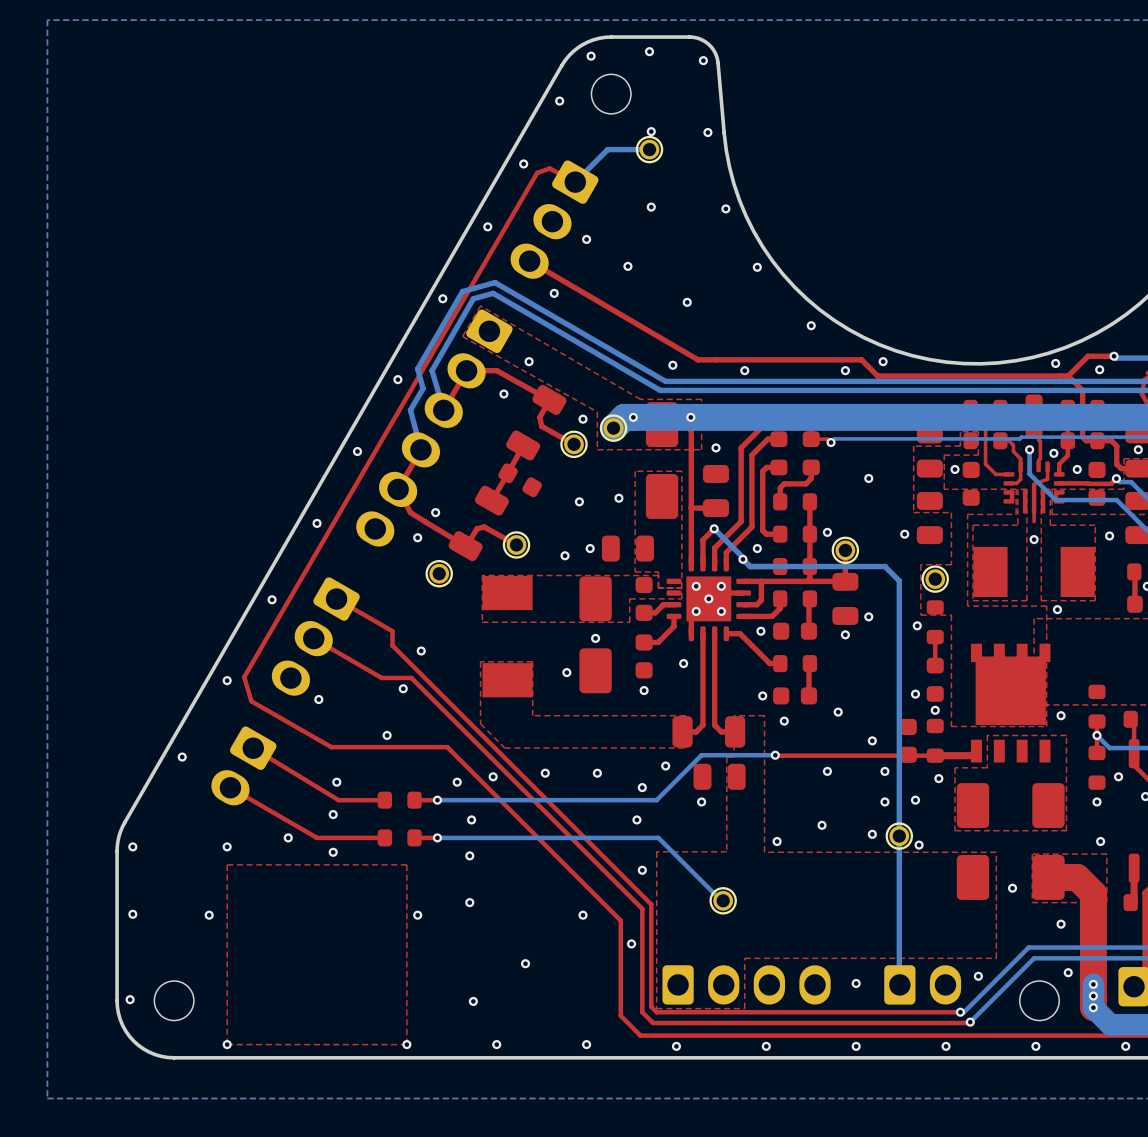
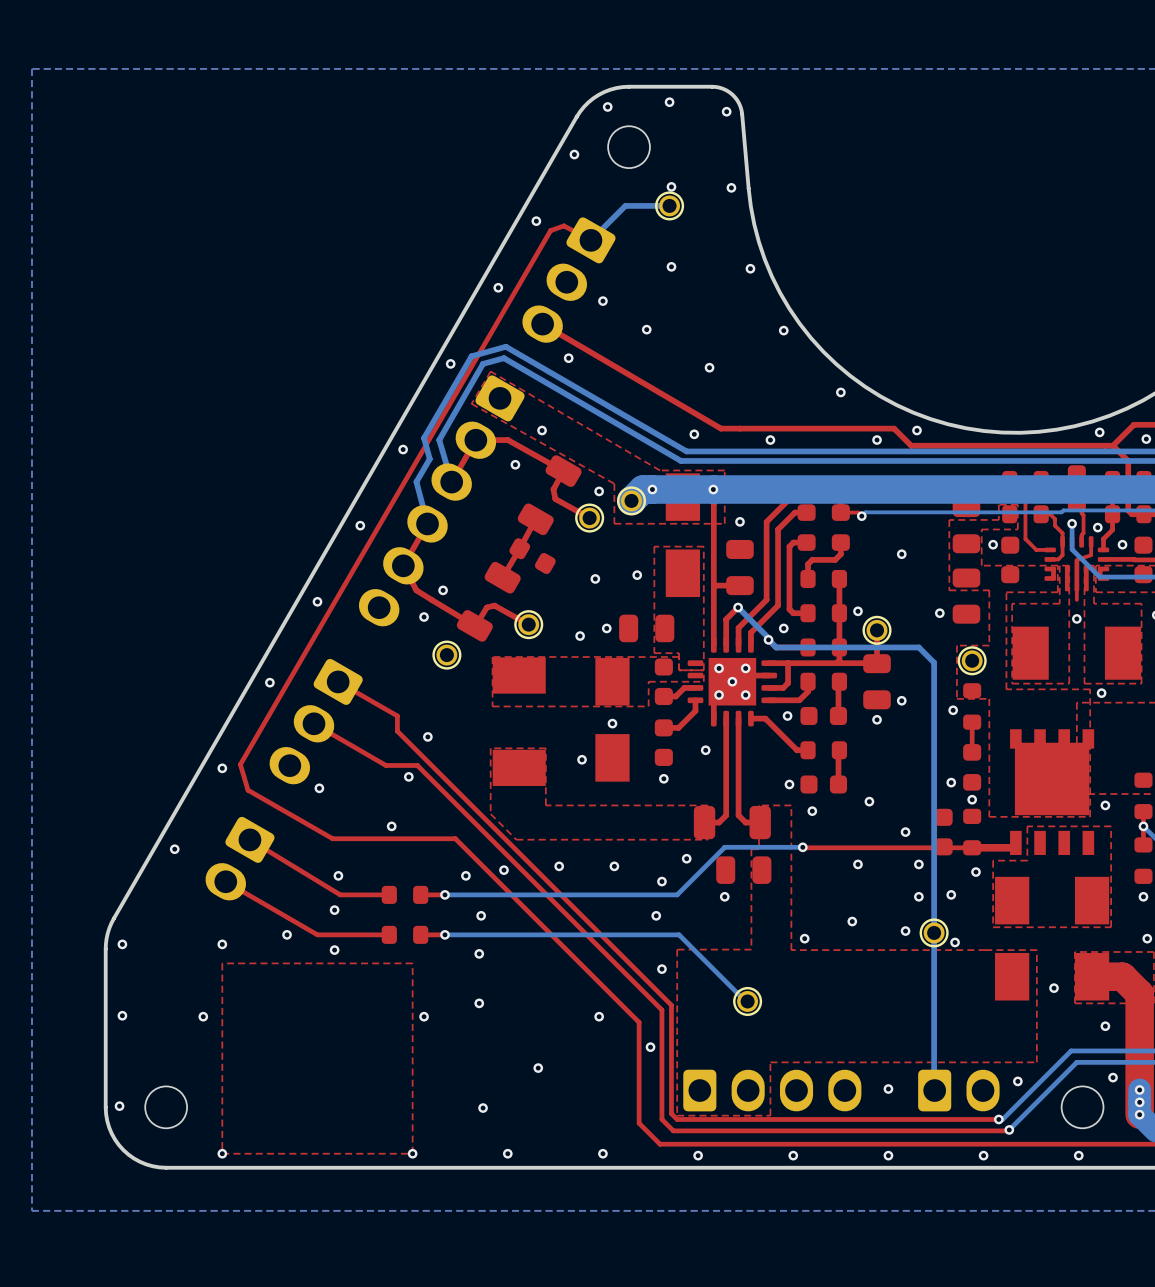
part footprint: [645, 402, 679, 519] -> [665, 473, 701, 598]
part footprint: [579, 576, 612, 694] -> [595, 657, 630, 782]
part footprint: [956, 783, 990, 900] -> [995, 876, 1030, 1001]
part footprint: [1032, 783, 1065, 900] -> [1074, 876, 1110, 1001]

